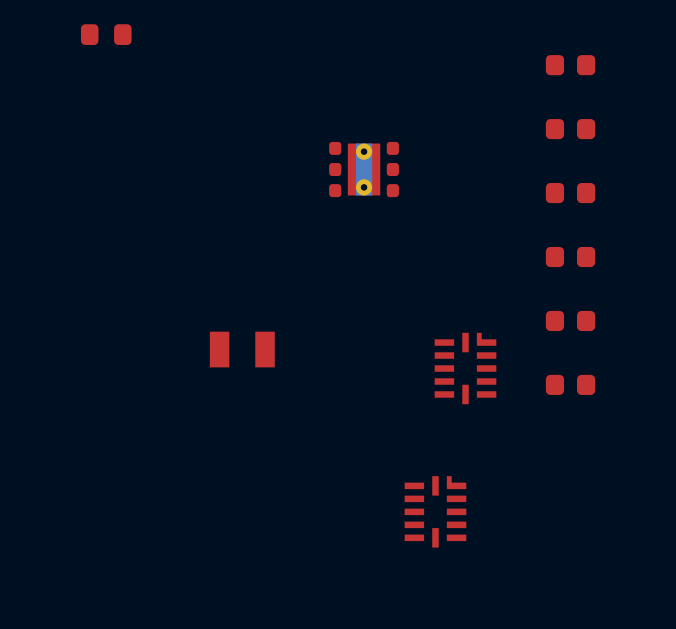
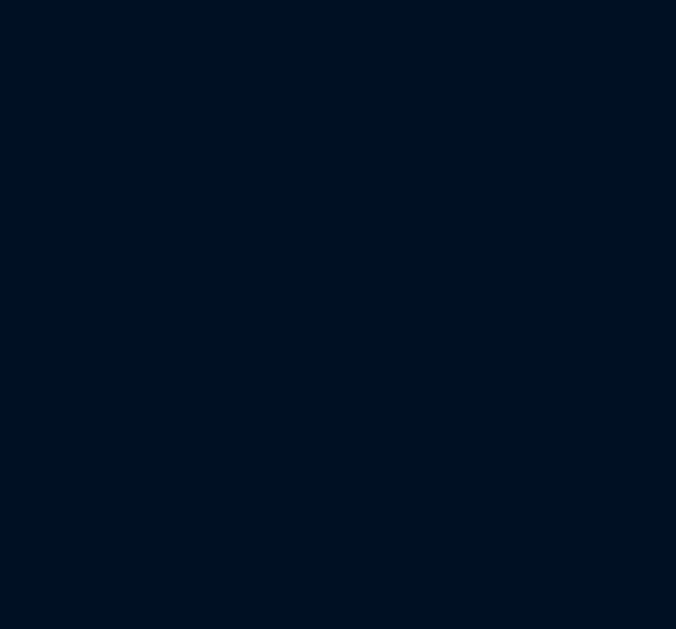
part: (106, 34) -> none
part: (570, 65) -> none
part: (570, 129) -> none
part: (364, 169) -> none
part: (570, 193) -> none
part: (570, 257) -> none
part: (570, 320) -> none
part: (242, 349) -> none
part: (465, 368) -> none
part: (570, 384) -> none
part: (435, 511) -> none

